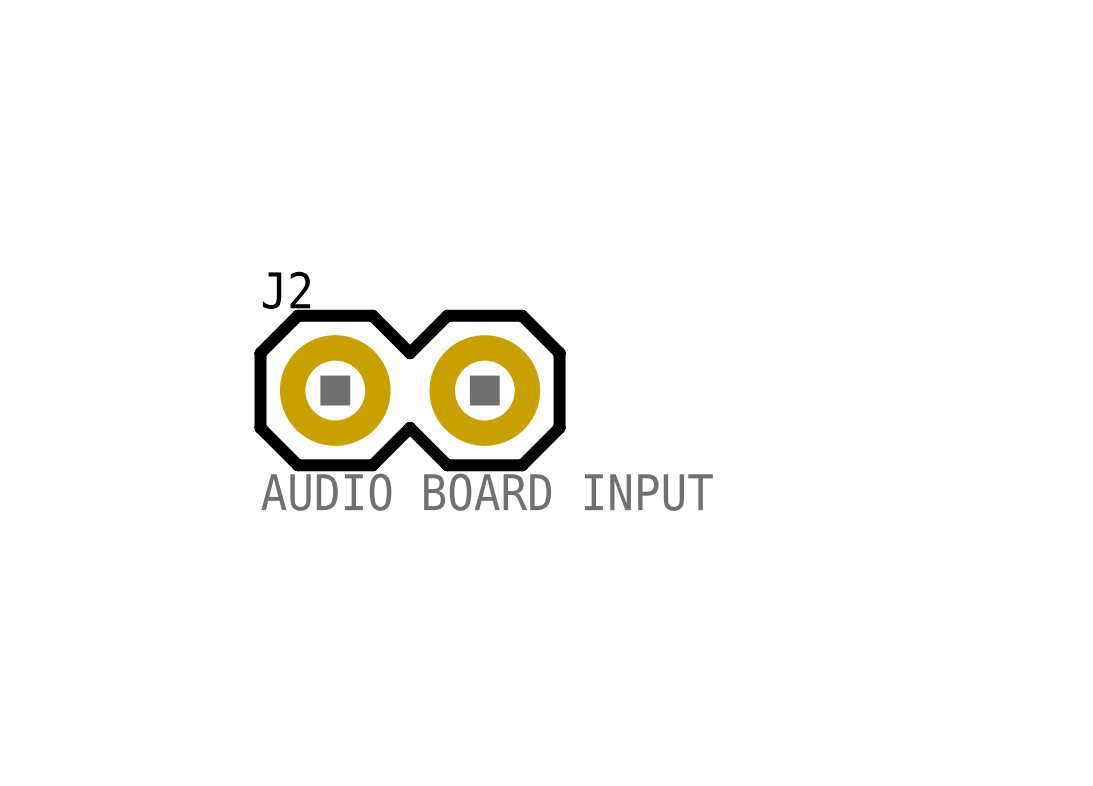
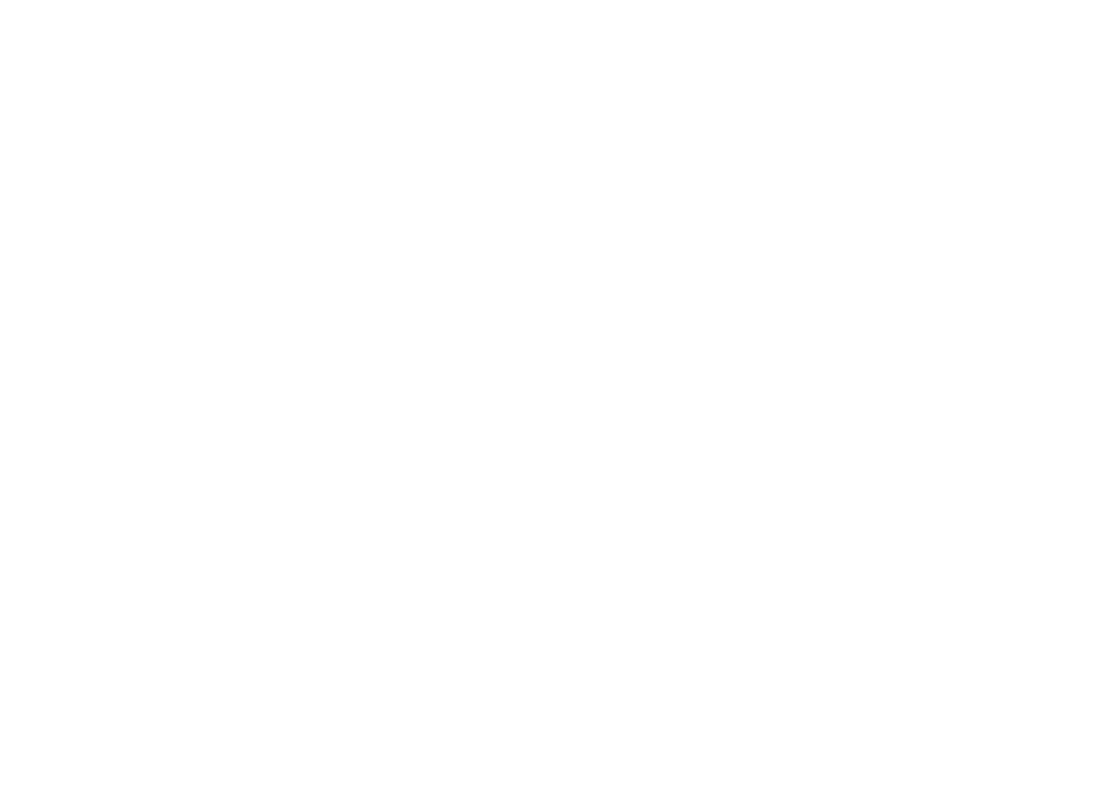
J2: AUDIO BOARD INPUT (410, 390) -> none

